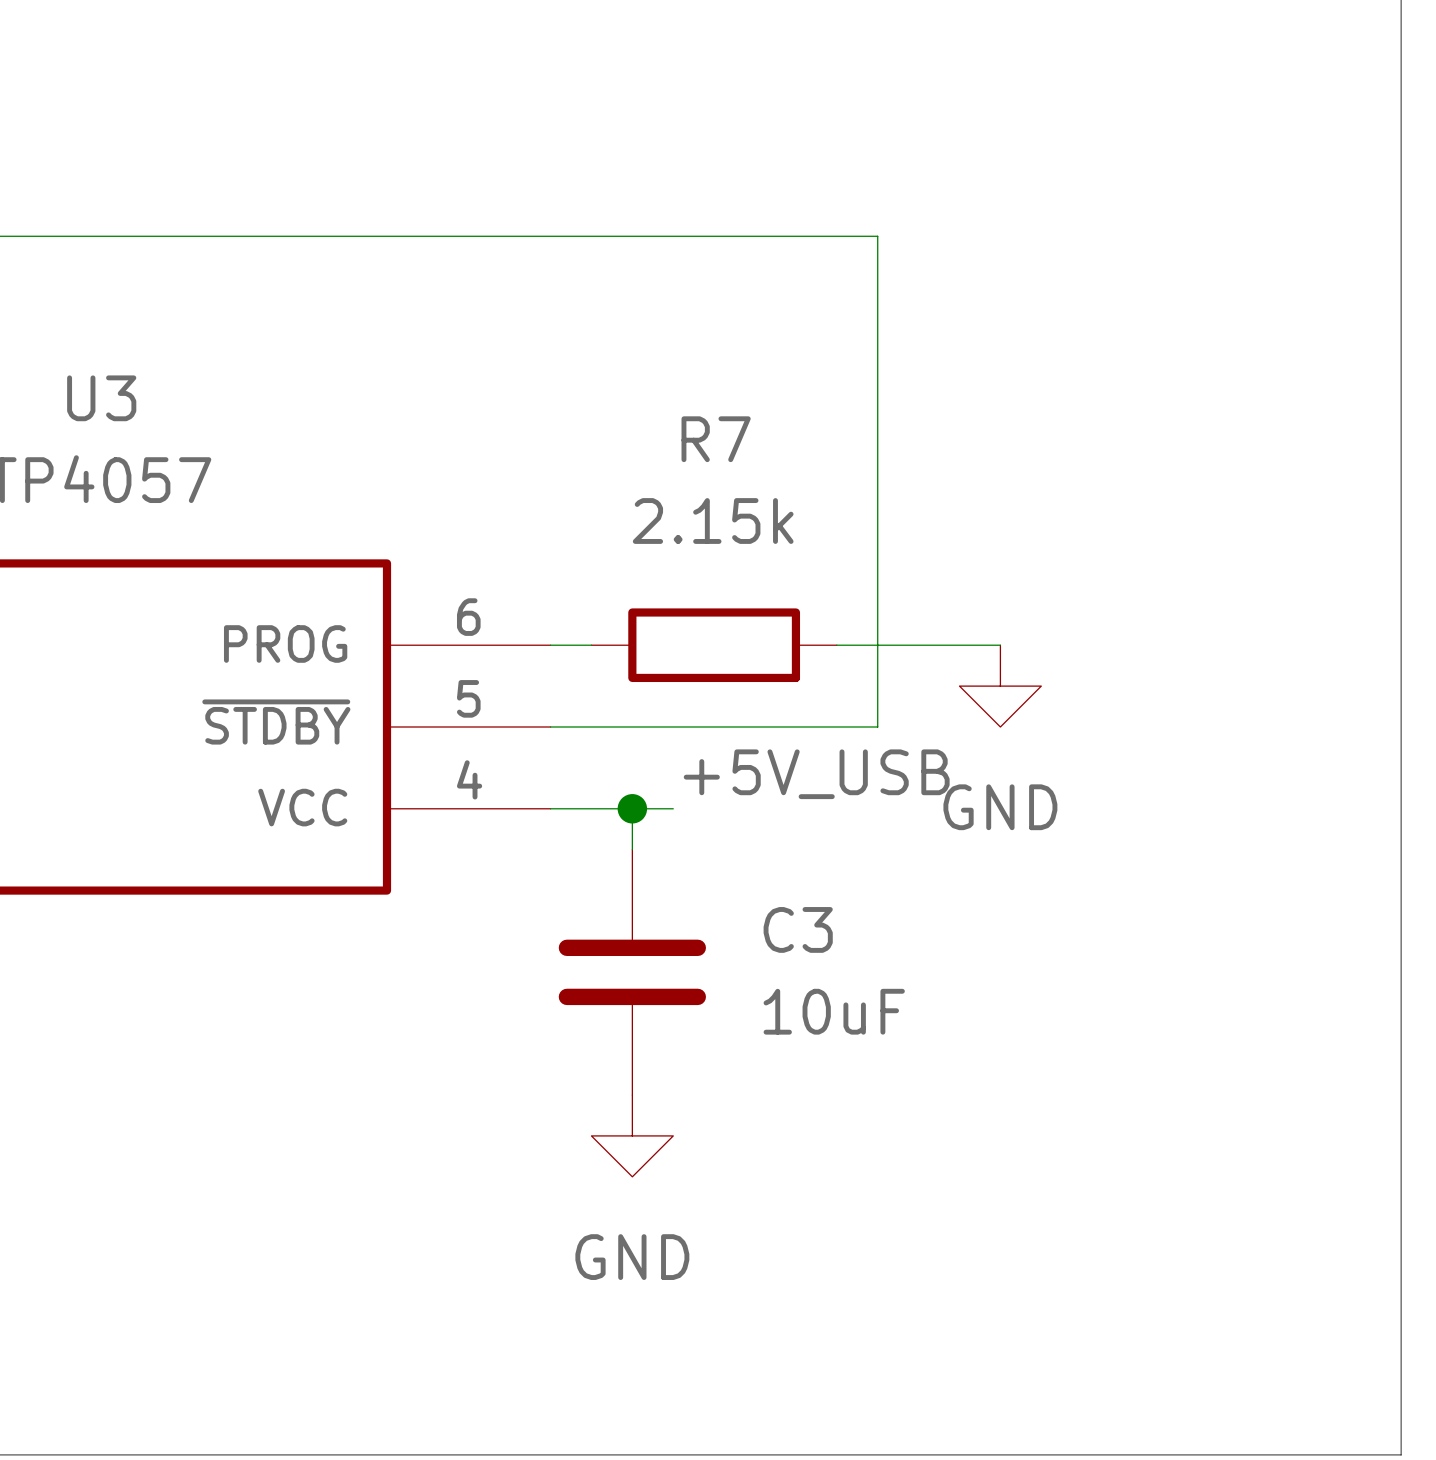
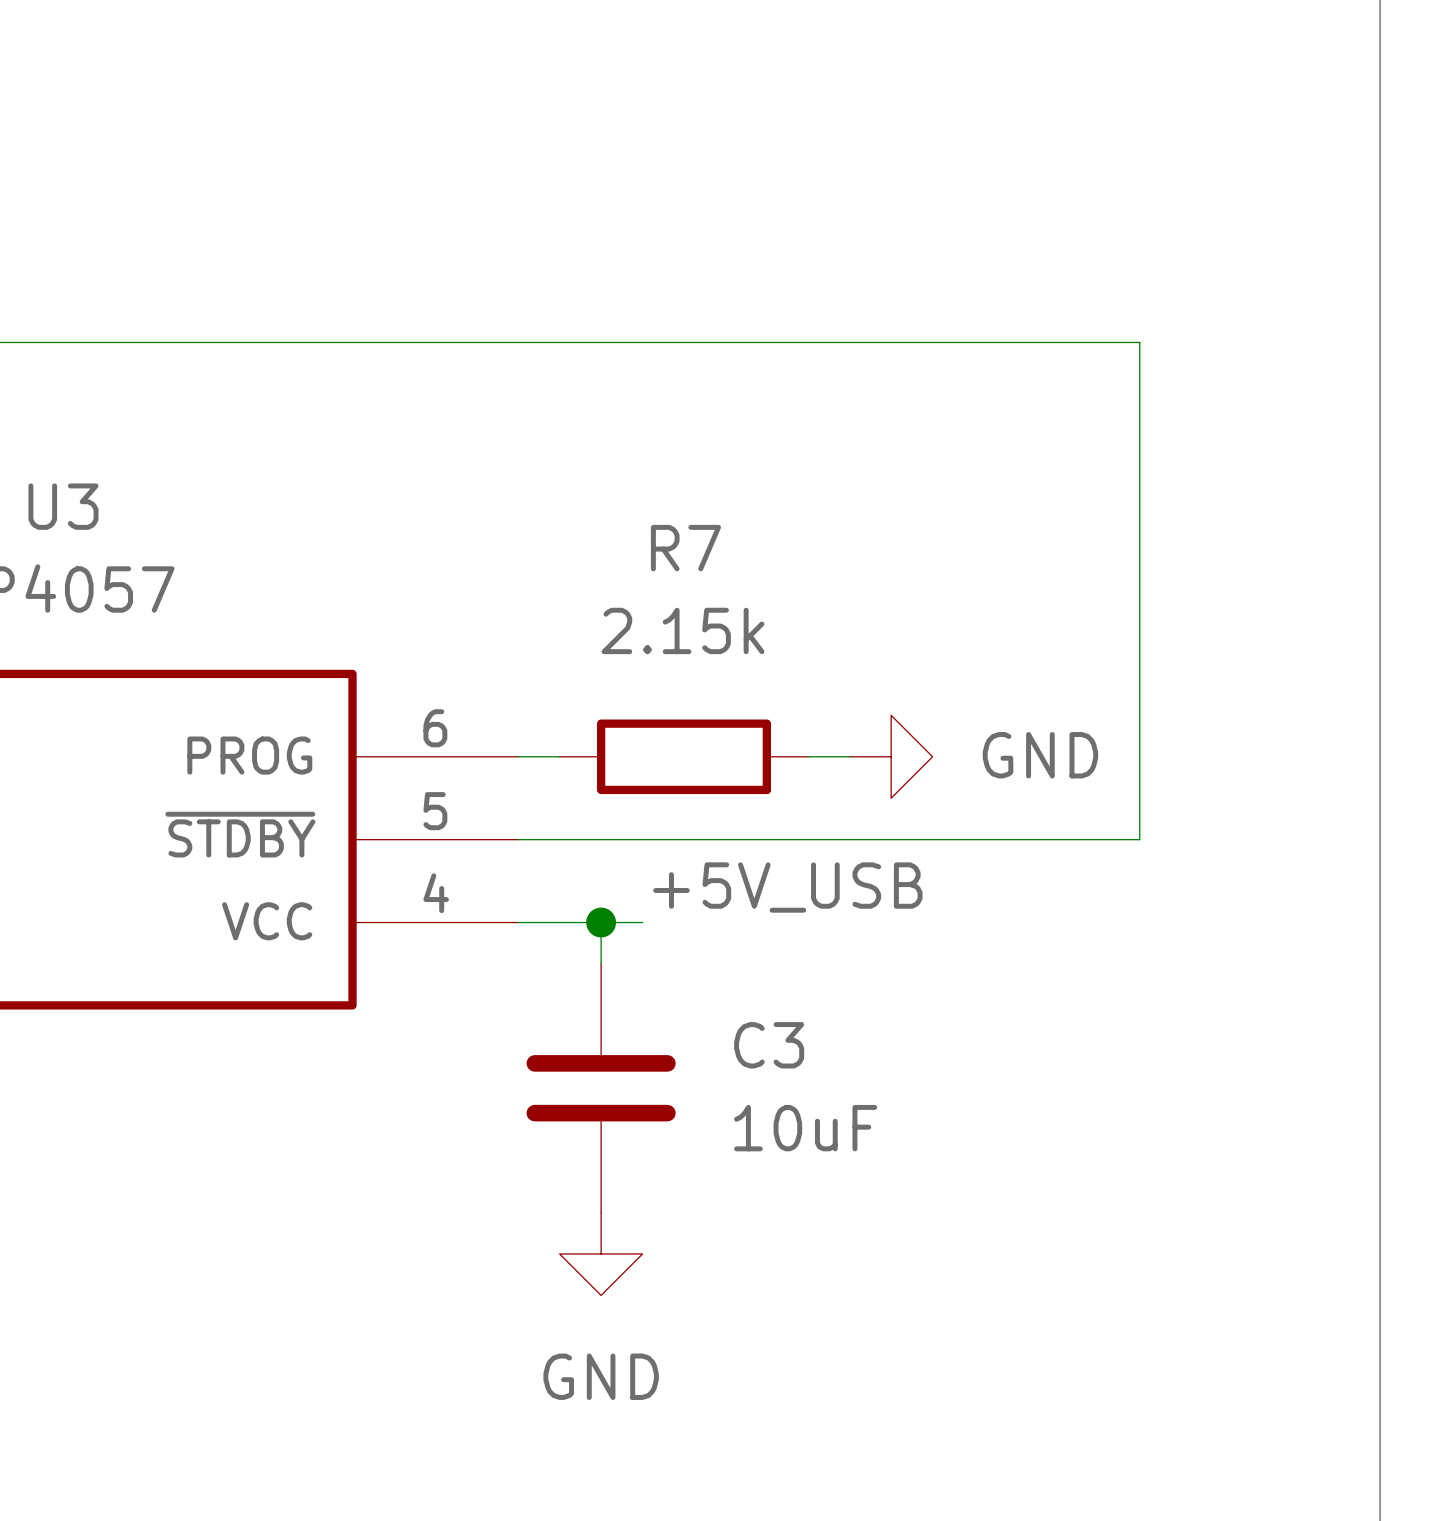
wire: (877, 236) (877, 727) -> (849, 342) (1139, 342) (1139, 839) (849, 839)
wire: (877, 645) (1000, 645) -> none
power symbol rotation: 0° (1000, 686) -> 90° counterclockwise (891, 756)
power symbol position: GND (1000, 686) -> GND (891, 756)

